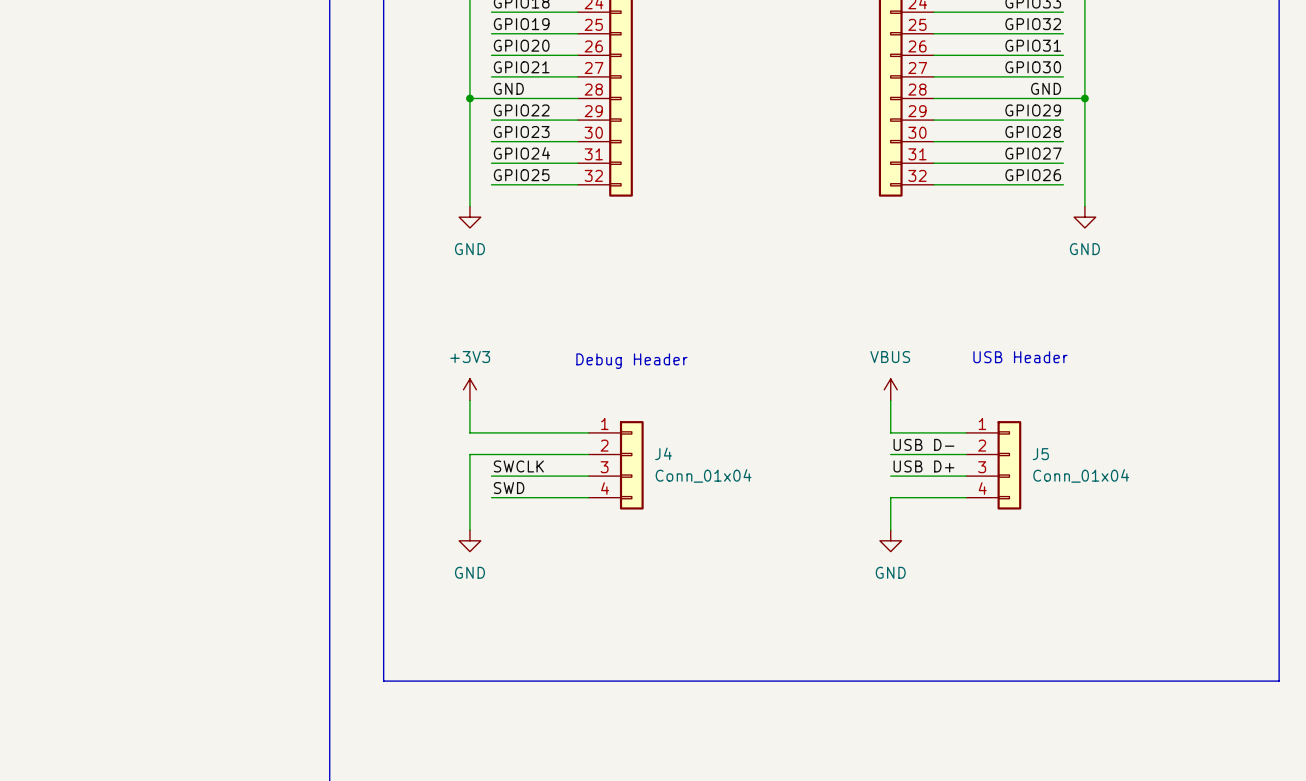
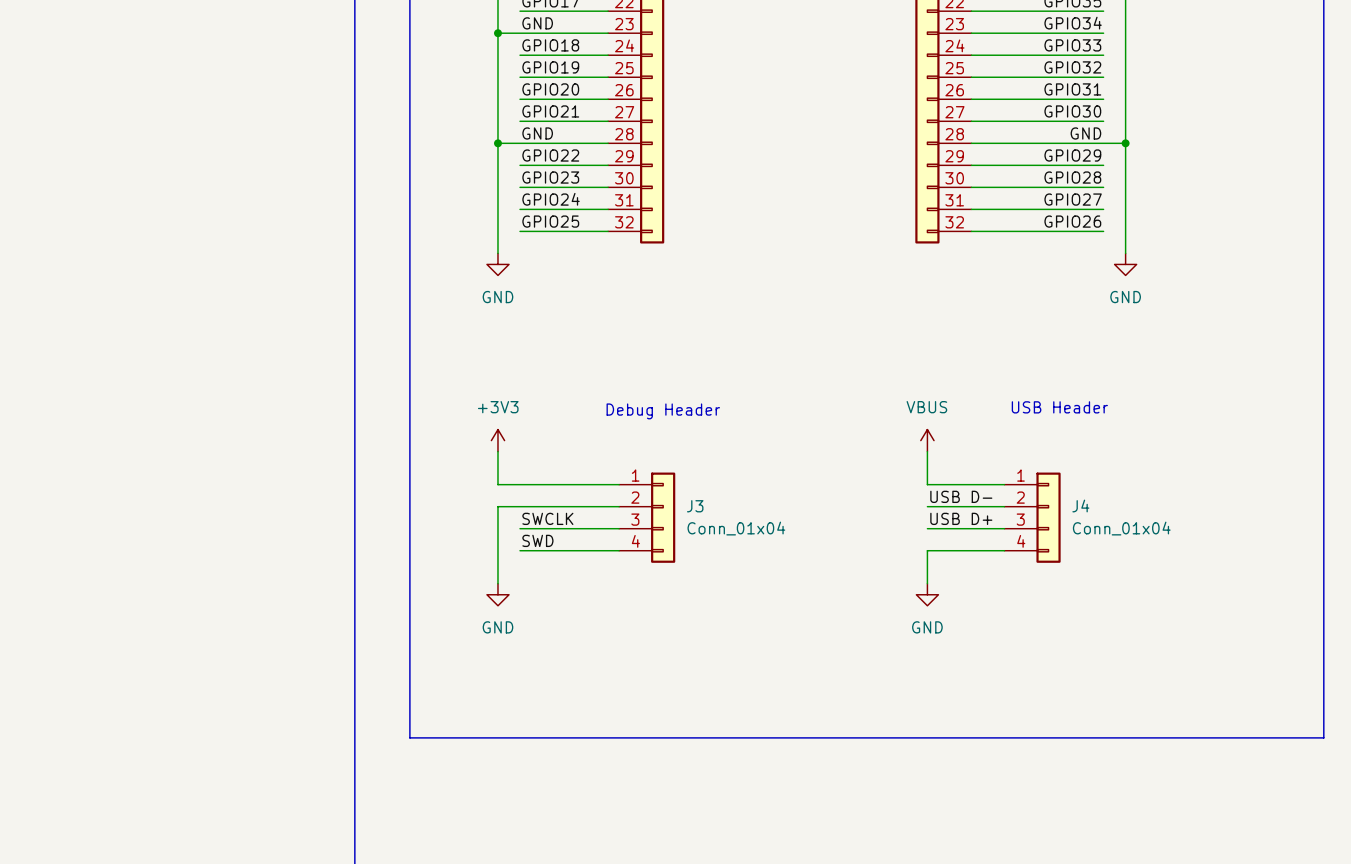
J4 name: J4 (663, 453) -> J3 (695, 506)
J5 name: J5 (1040, 454) -> J4 (1080, 506)

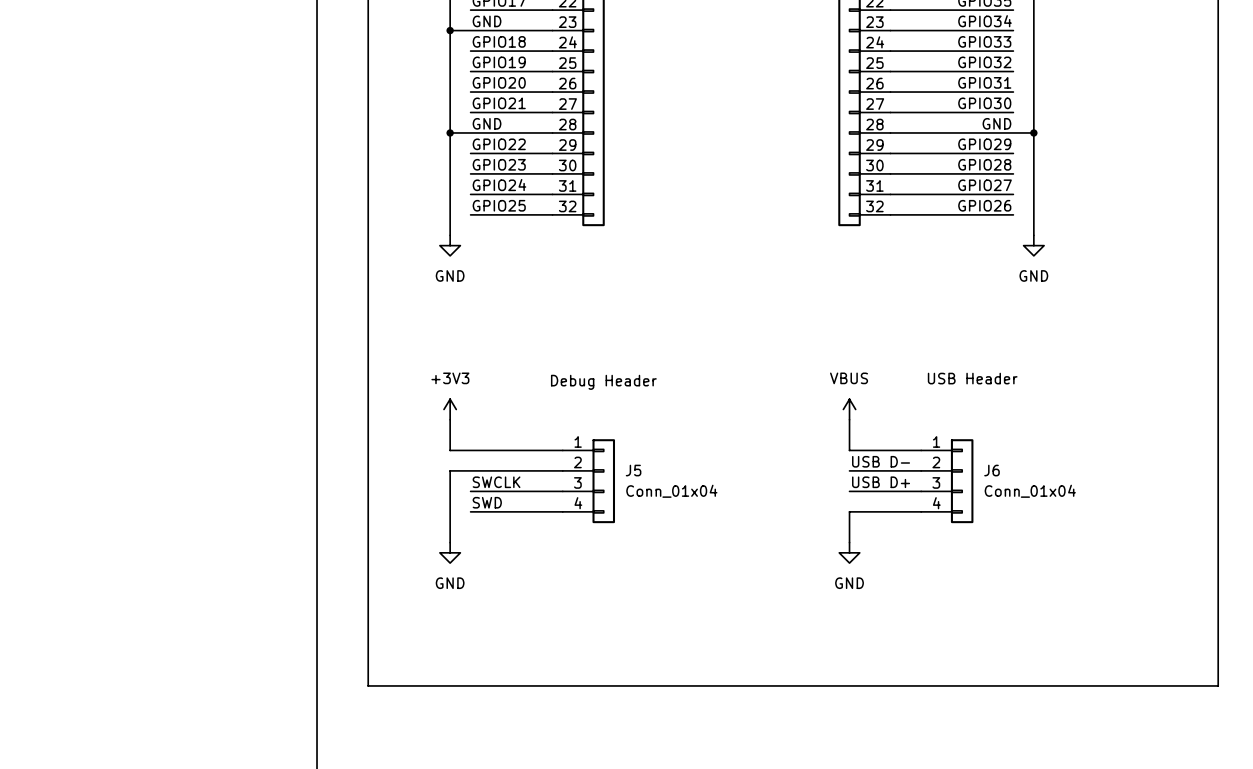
J3 name: J3 (695, 506) -> J5 (633, 470)
J4 name: J4 (1080, 506) -> J6 (991, 470)

